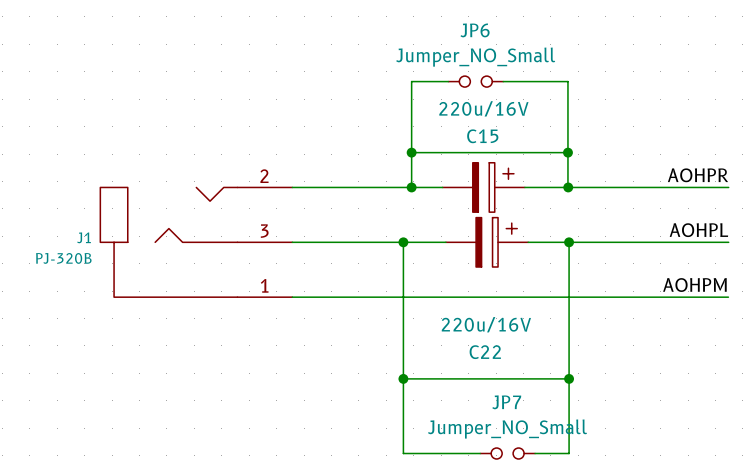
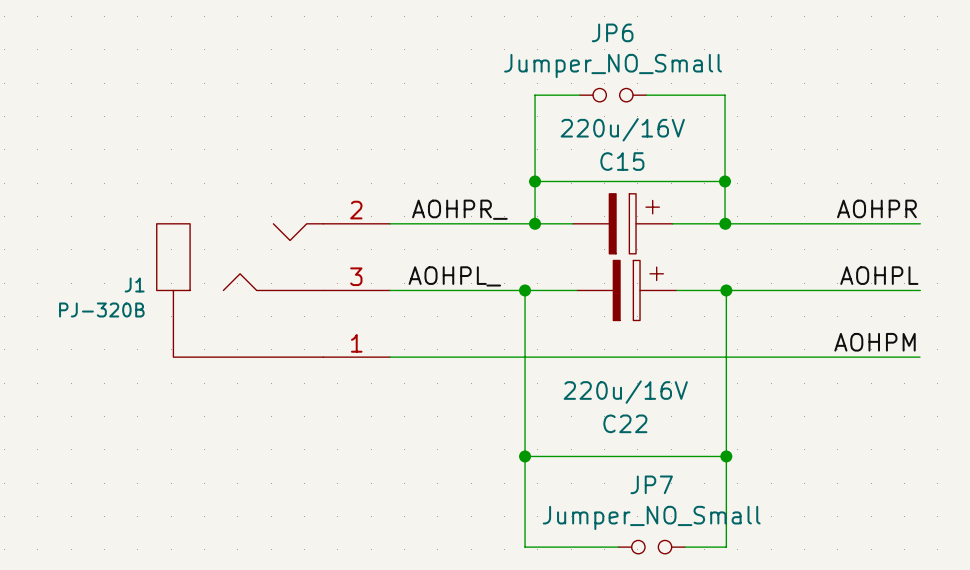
label: none -> AOHPR_ (459, 209)
label: none -> AOHPL_ (454, 276)

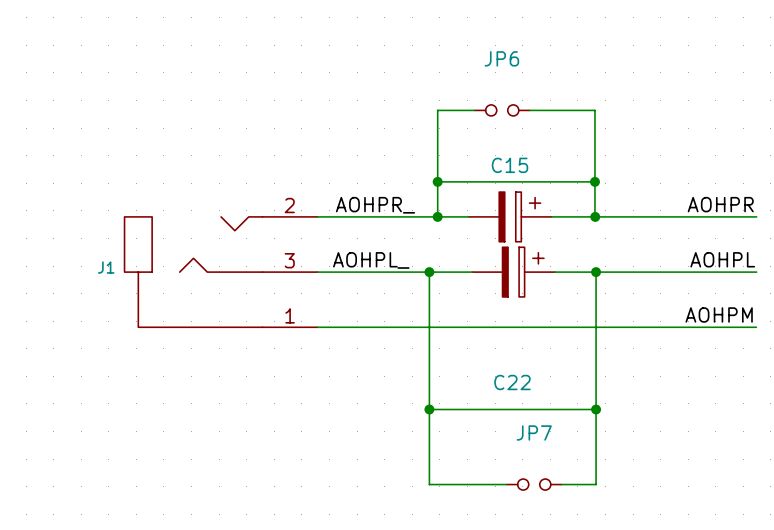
JP6 value: Jumper_NO_Small (613, 65) -> none
C15 value: 220u/16V (622, 129) -> none
J1 value: PJ-320B (101, 309) -> none
C22 value: 220u/16V (625, 392) -> none
JP7 value: Jumper_NO_Small (651, 517) -> none

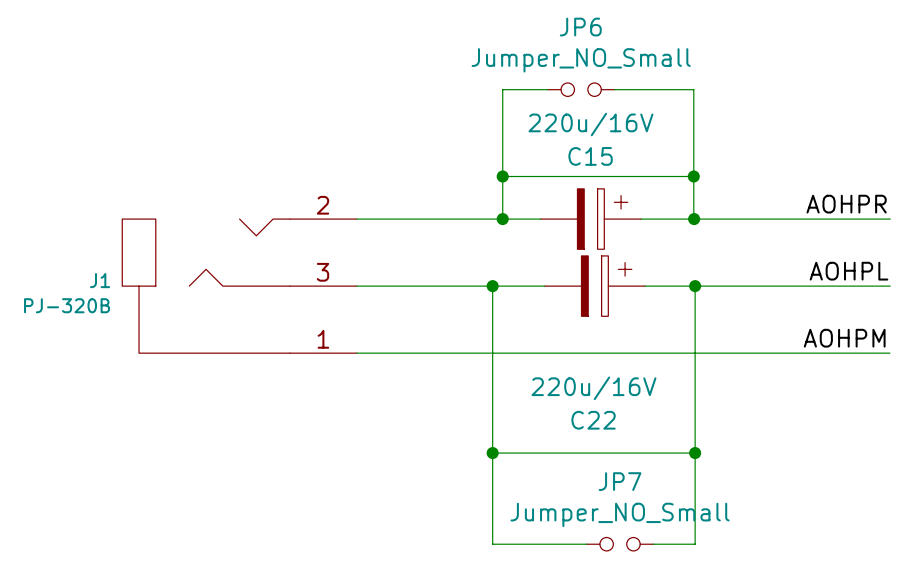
JP6 value: none -> Jumper_NO_Small (581, 60)
C15 value: none -> 220u/16V (590, 124)
label: AOHPR_ (375, 205) -> none
label: AOHPL_ (371, 260) -> none
J1 value: none -> PJ-320B (67, 305)
C22 value: none -> 220u/16V (593, 388)
JP7 value: none -> Jumper_NO_Small (620, 514)

